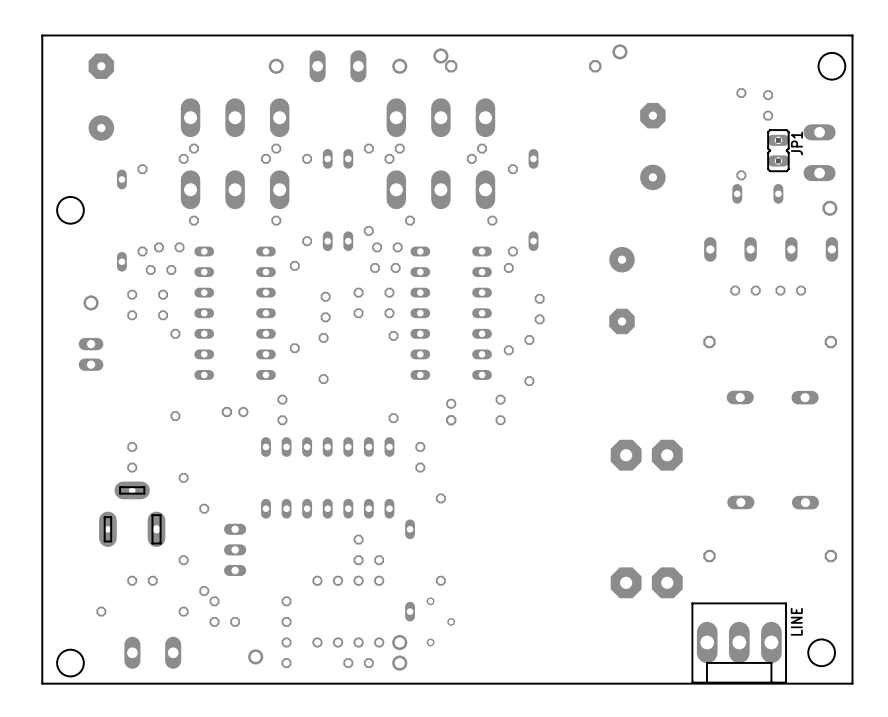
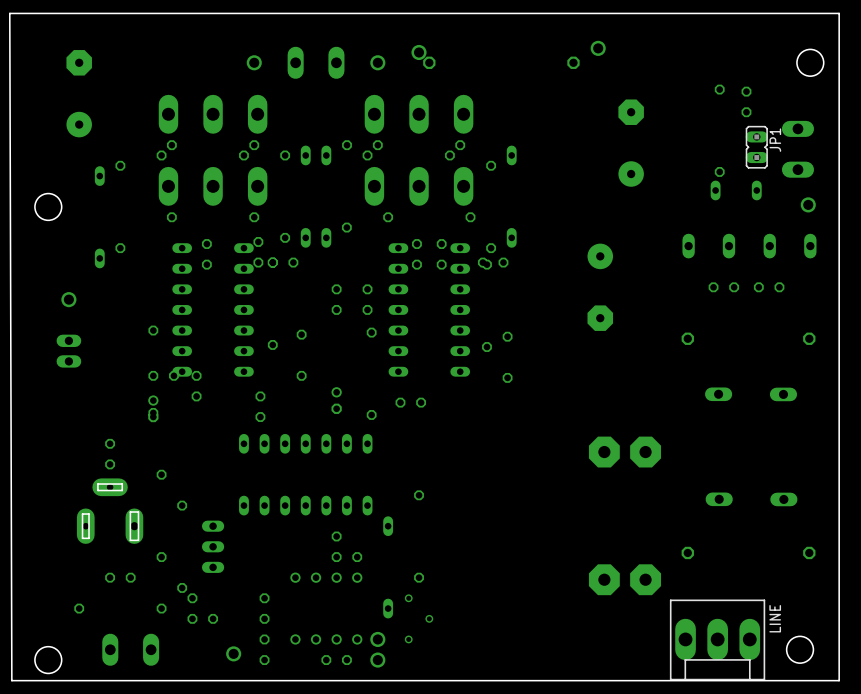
part: (169, 247) -> none
part: (387, 247) -> none
part: none -> (258, 252)
part: none -> (206, 254)
part: none -> (416, 254)
part: none -> (441, 254)
part: none -> (283, 262)
part: none -> (493, 262)
part: (385, 267) -> none
part: (161, 270) -> none
part: (132, 304) -> none
part: (163, 304) -> none
part: (325, 307) -> none
part: (539, 309) -> none
part: none -> (163, 375)
part: none -> (196, 386)
part: none -> (336, 400)
part: none -> (410, 402)
part: (500, 409) -> none
part rotation: 0° (235, 412) -> 90° counterclockwise (153, 408)
part position: (235, 412) -> (153, 408)
part: (451, 412) -> none
part: (420, 457) -> none
board edge: (852, 683) (852, 35) (42, 35) (42, 683) -> (830, 680) (839, 680) (839, 13) (9, 13) (11, 680) (20, 680)

